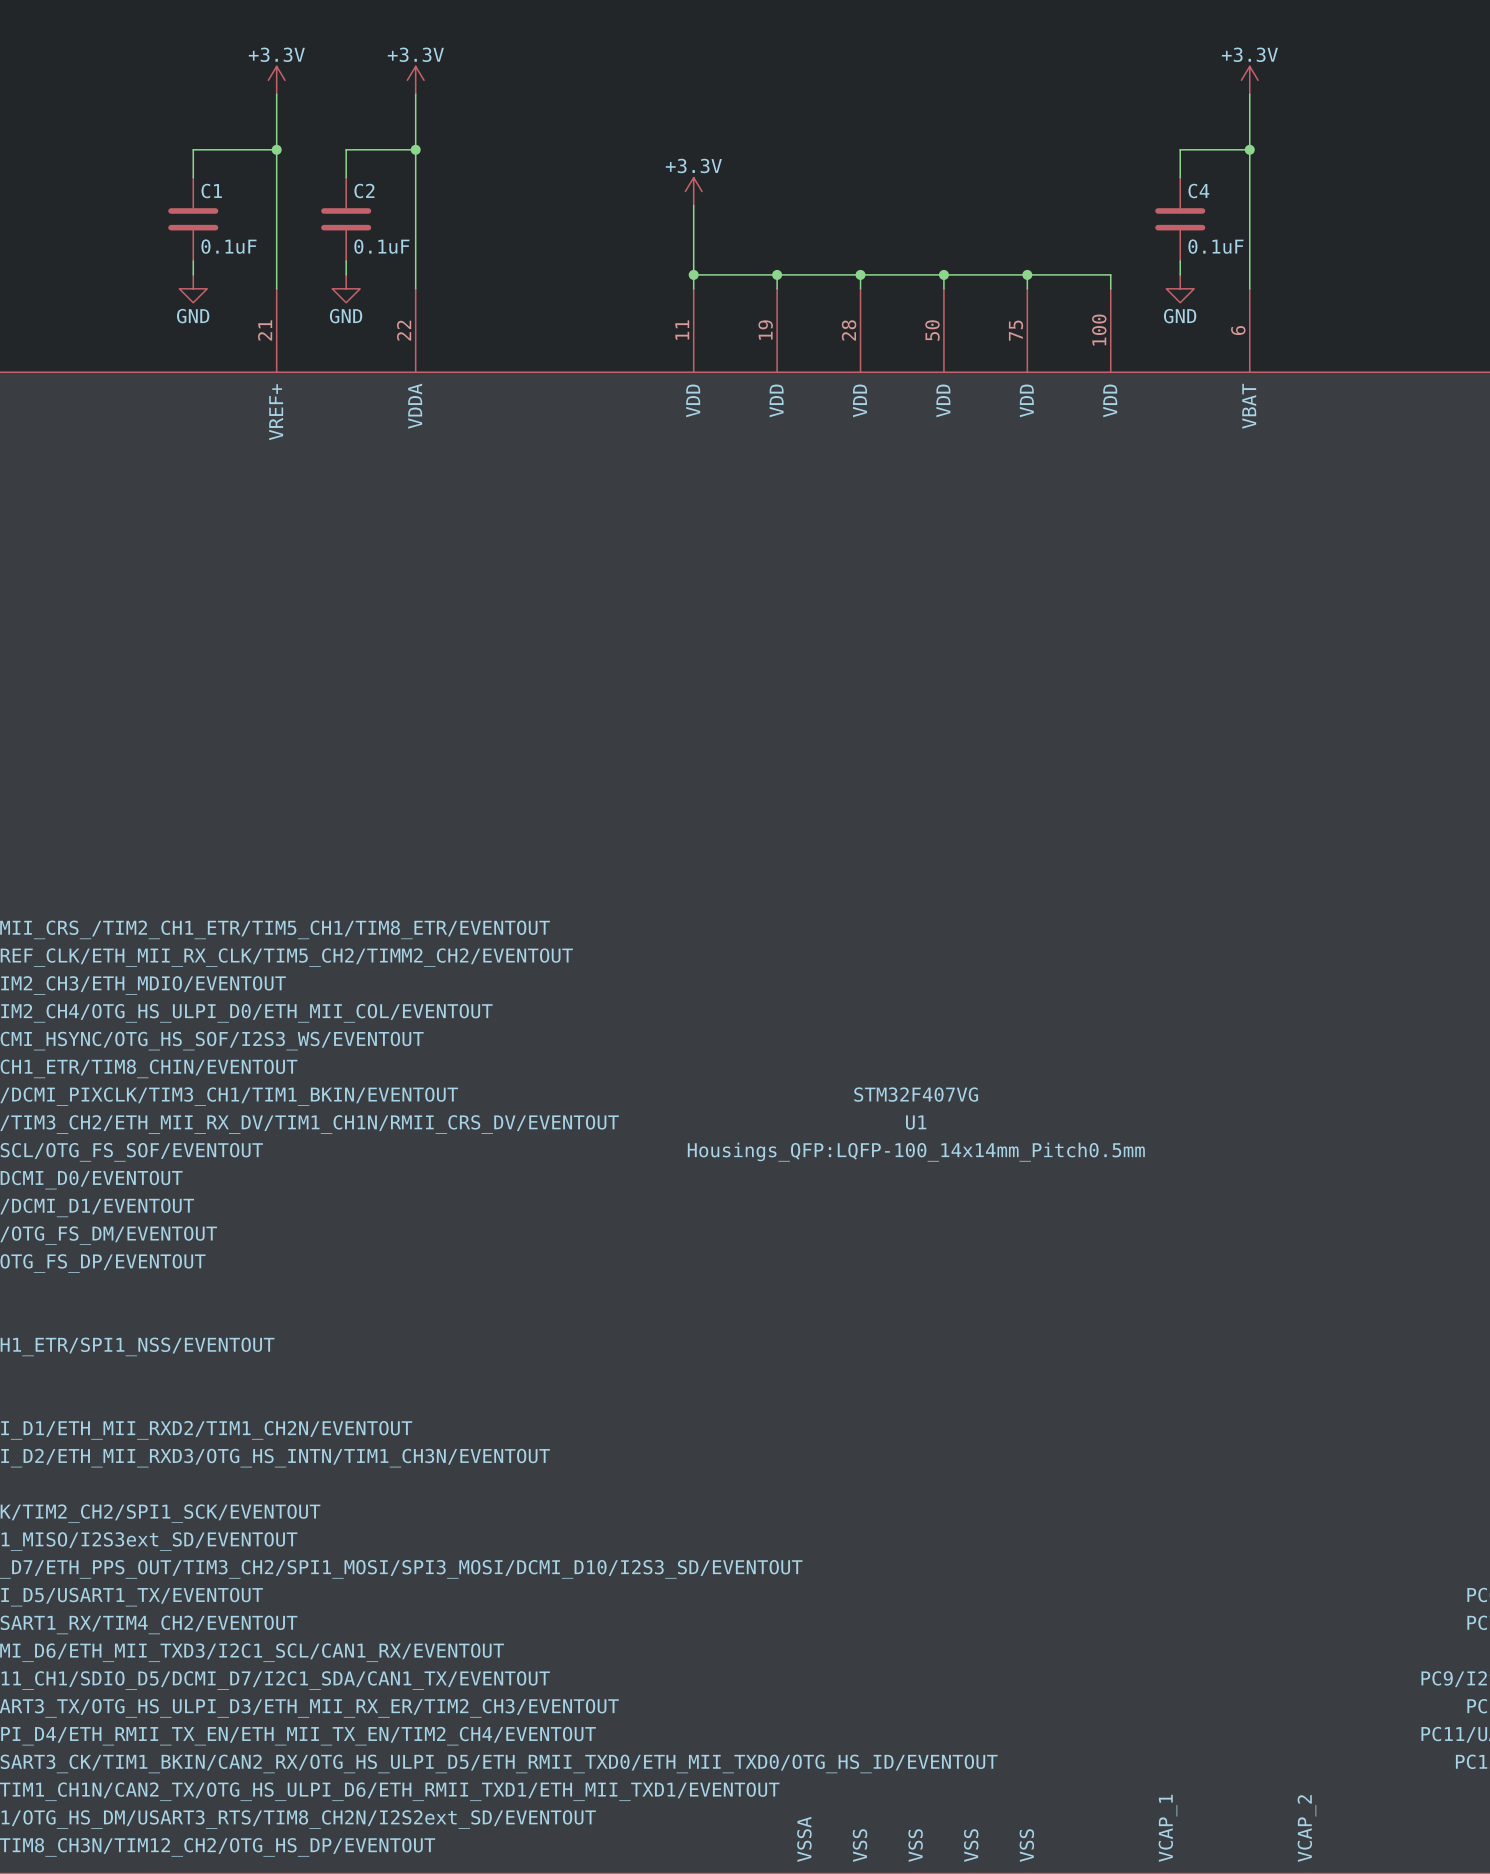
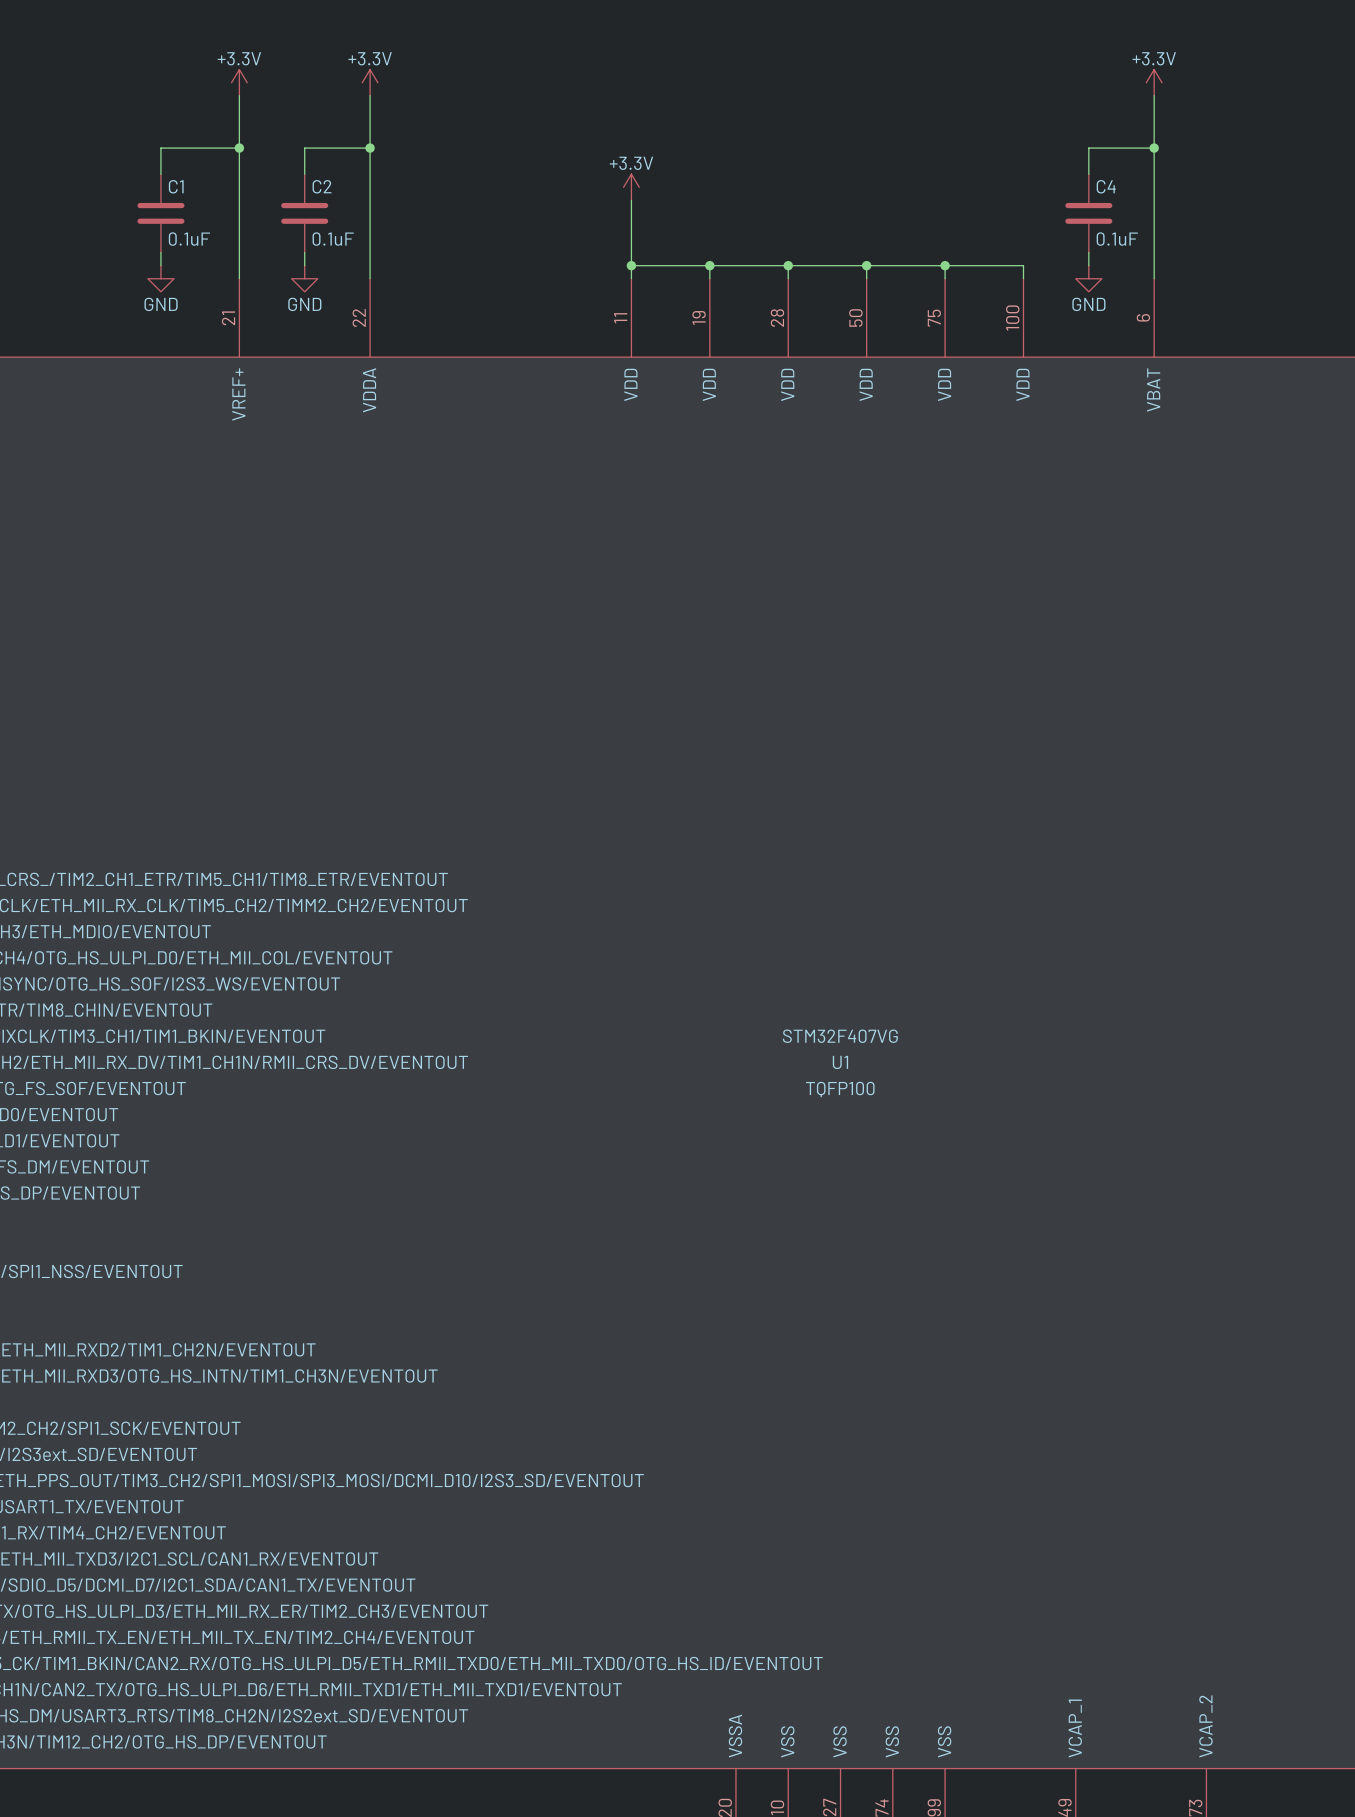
U1 text: Housings_QFP:LQFP-100_14x14mm_Pitch0.5mm (916, 1152) -> TQFP100 (840, 1089)

